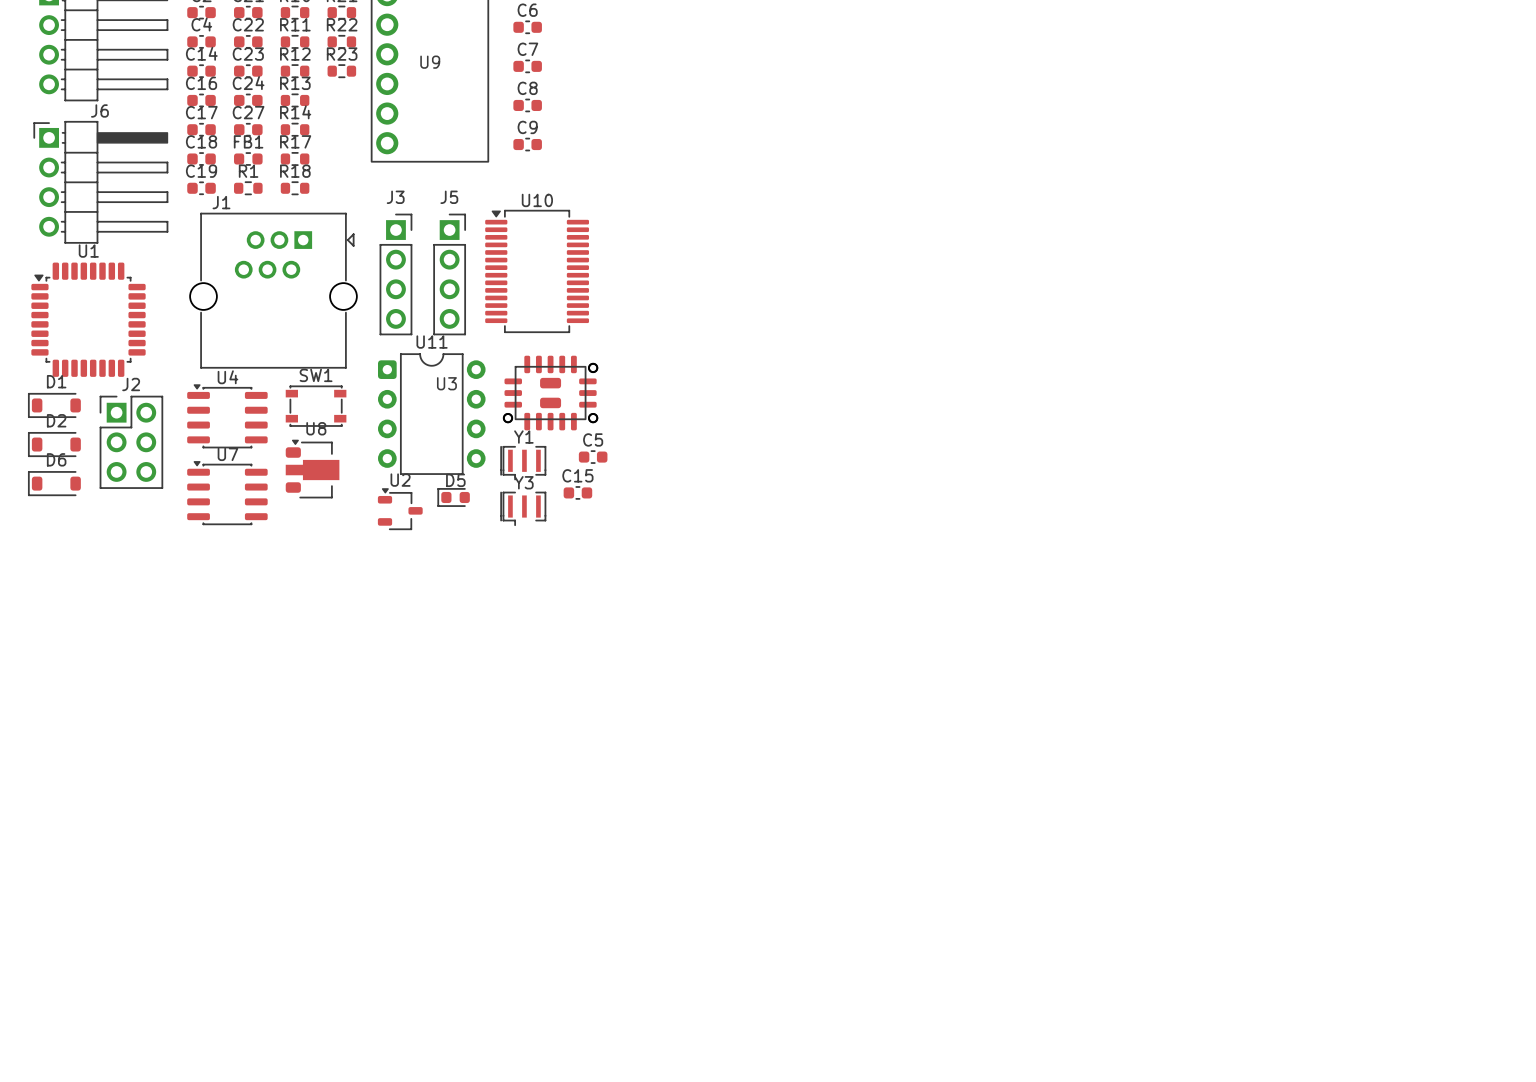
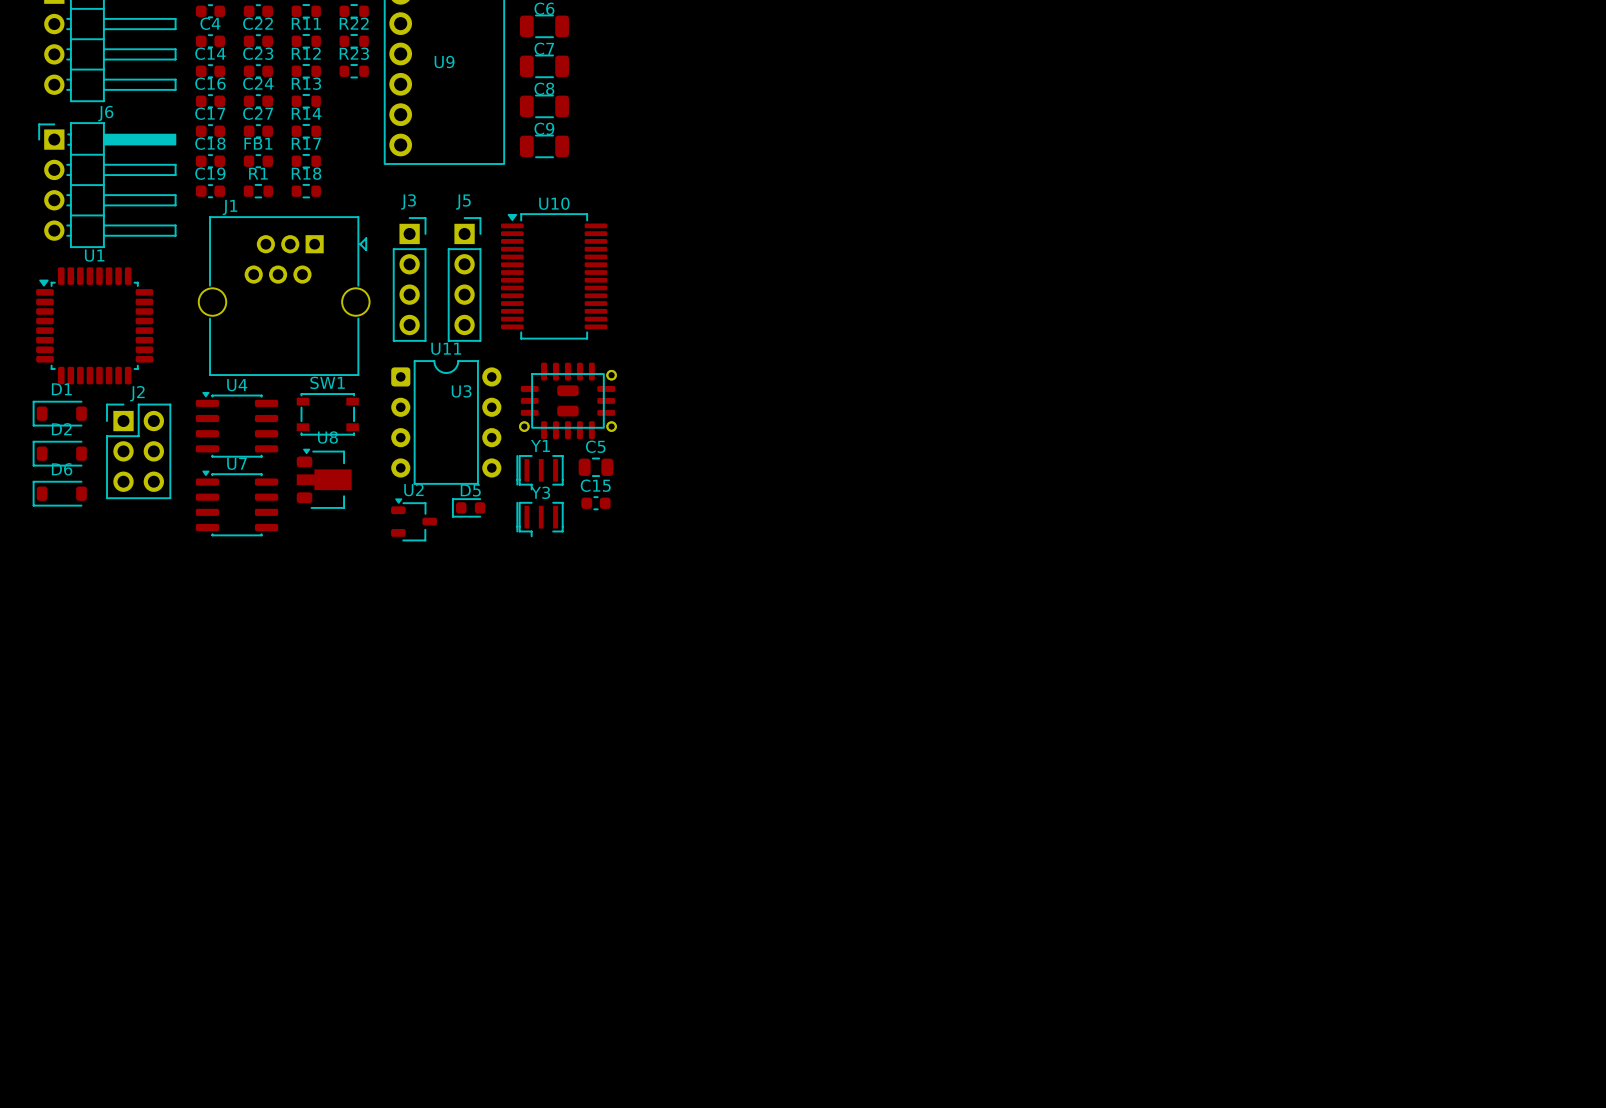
C6 footprint: [513, 20, 542, 34] -> [520, 14, 569, 38]
C7 footprint: [513, 59, 542, 74] -> [520, 54, 569, 78]
C8 footprint: [513, 98, 542, 113] -> [520, 94, 569, 118]
C9 footprint: [513, 137, 542, 152] -> [520, 134, 569, 158]
C5 footprint: [578, 450, 608, 464] -> [578, 457, 614, 477]

